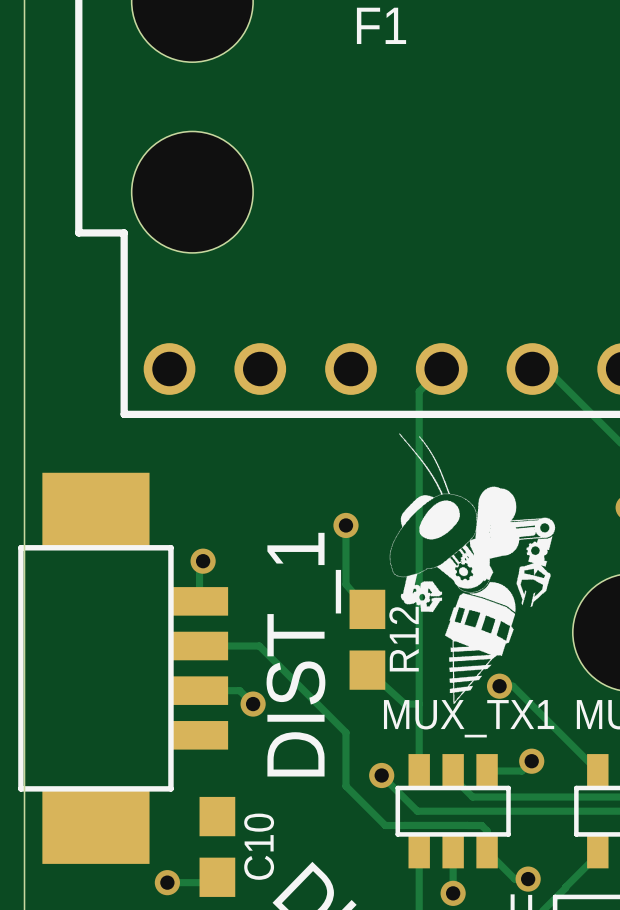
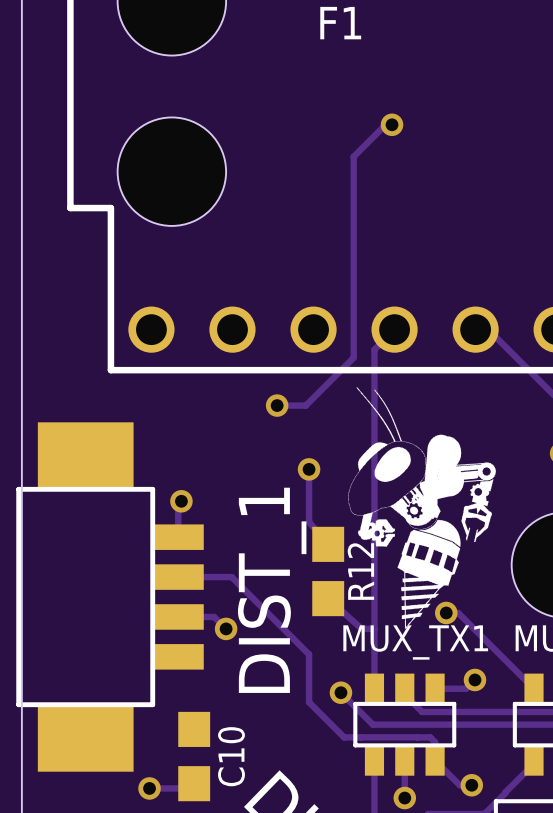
track: none -> (392, 124) (385, 124) (353, 156) (353, 357) (305, 405) (277, 405)
via: none -> (392, 124)
via: none -> (277, 405)

